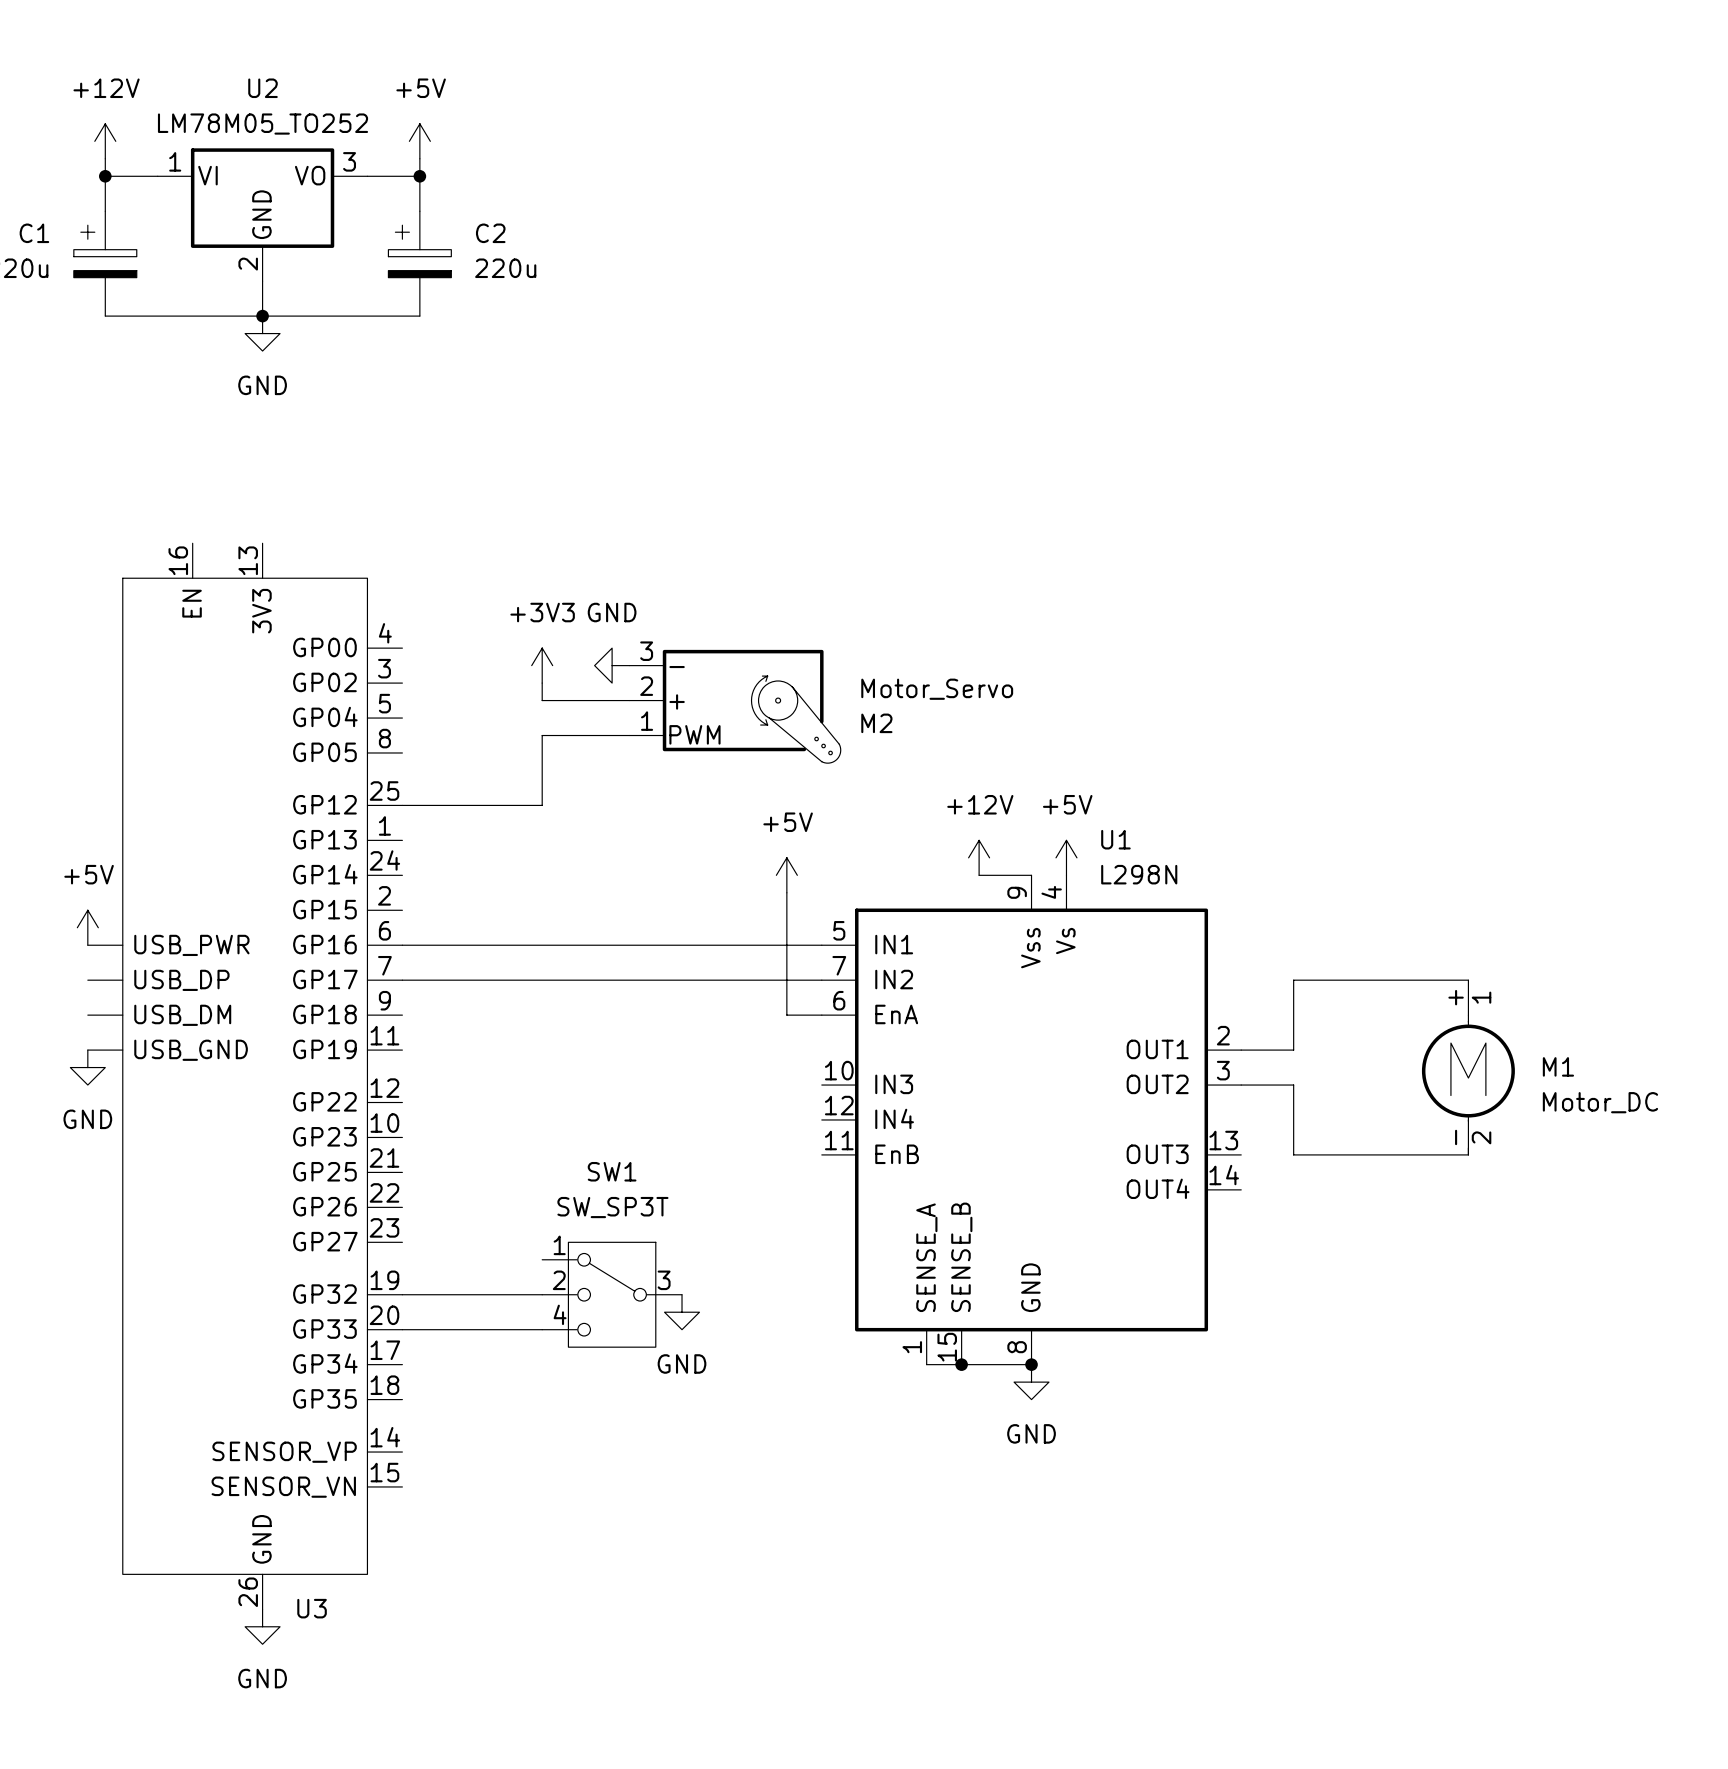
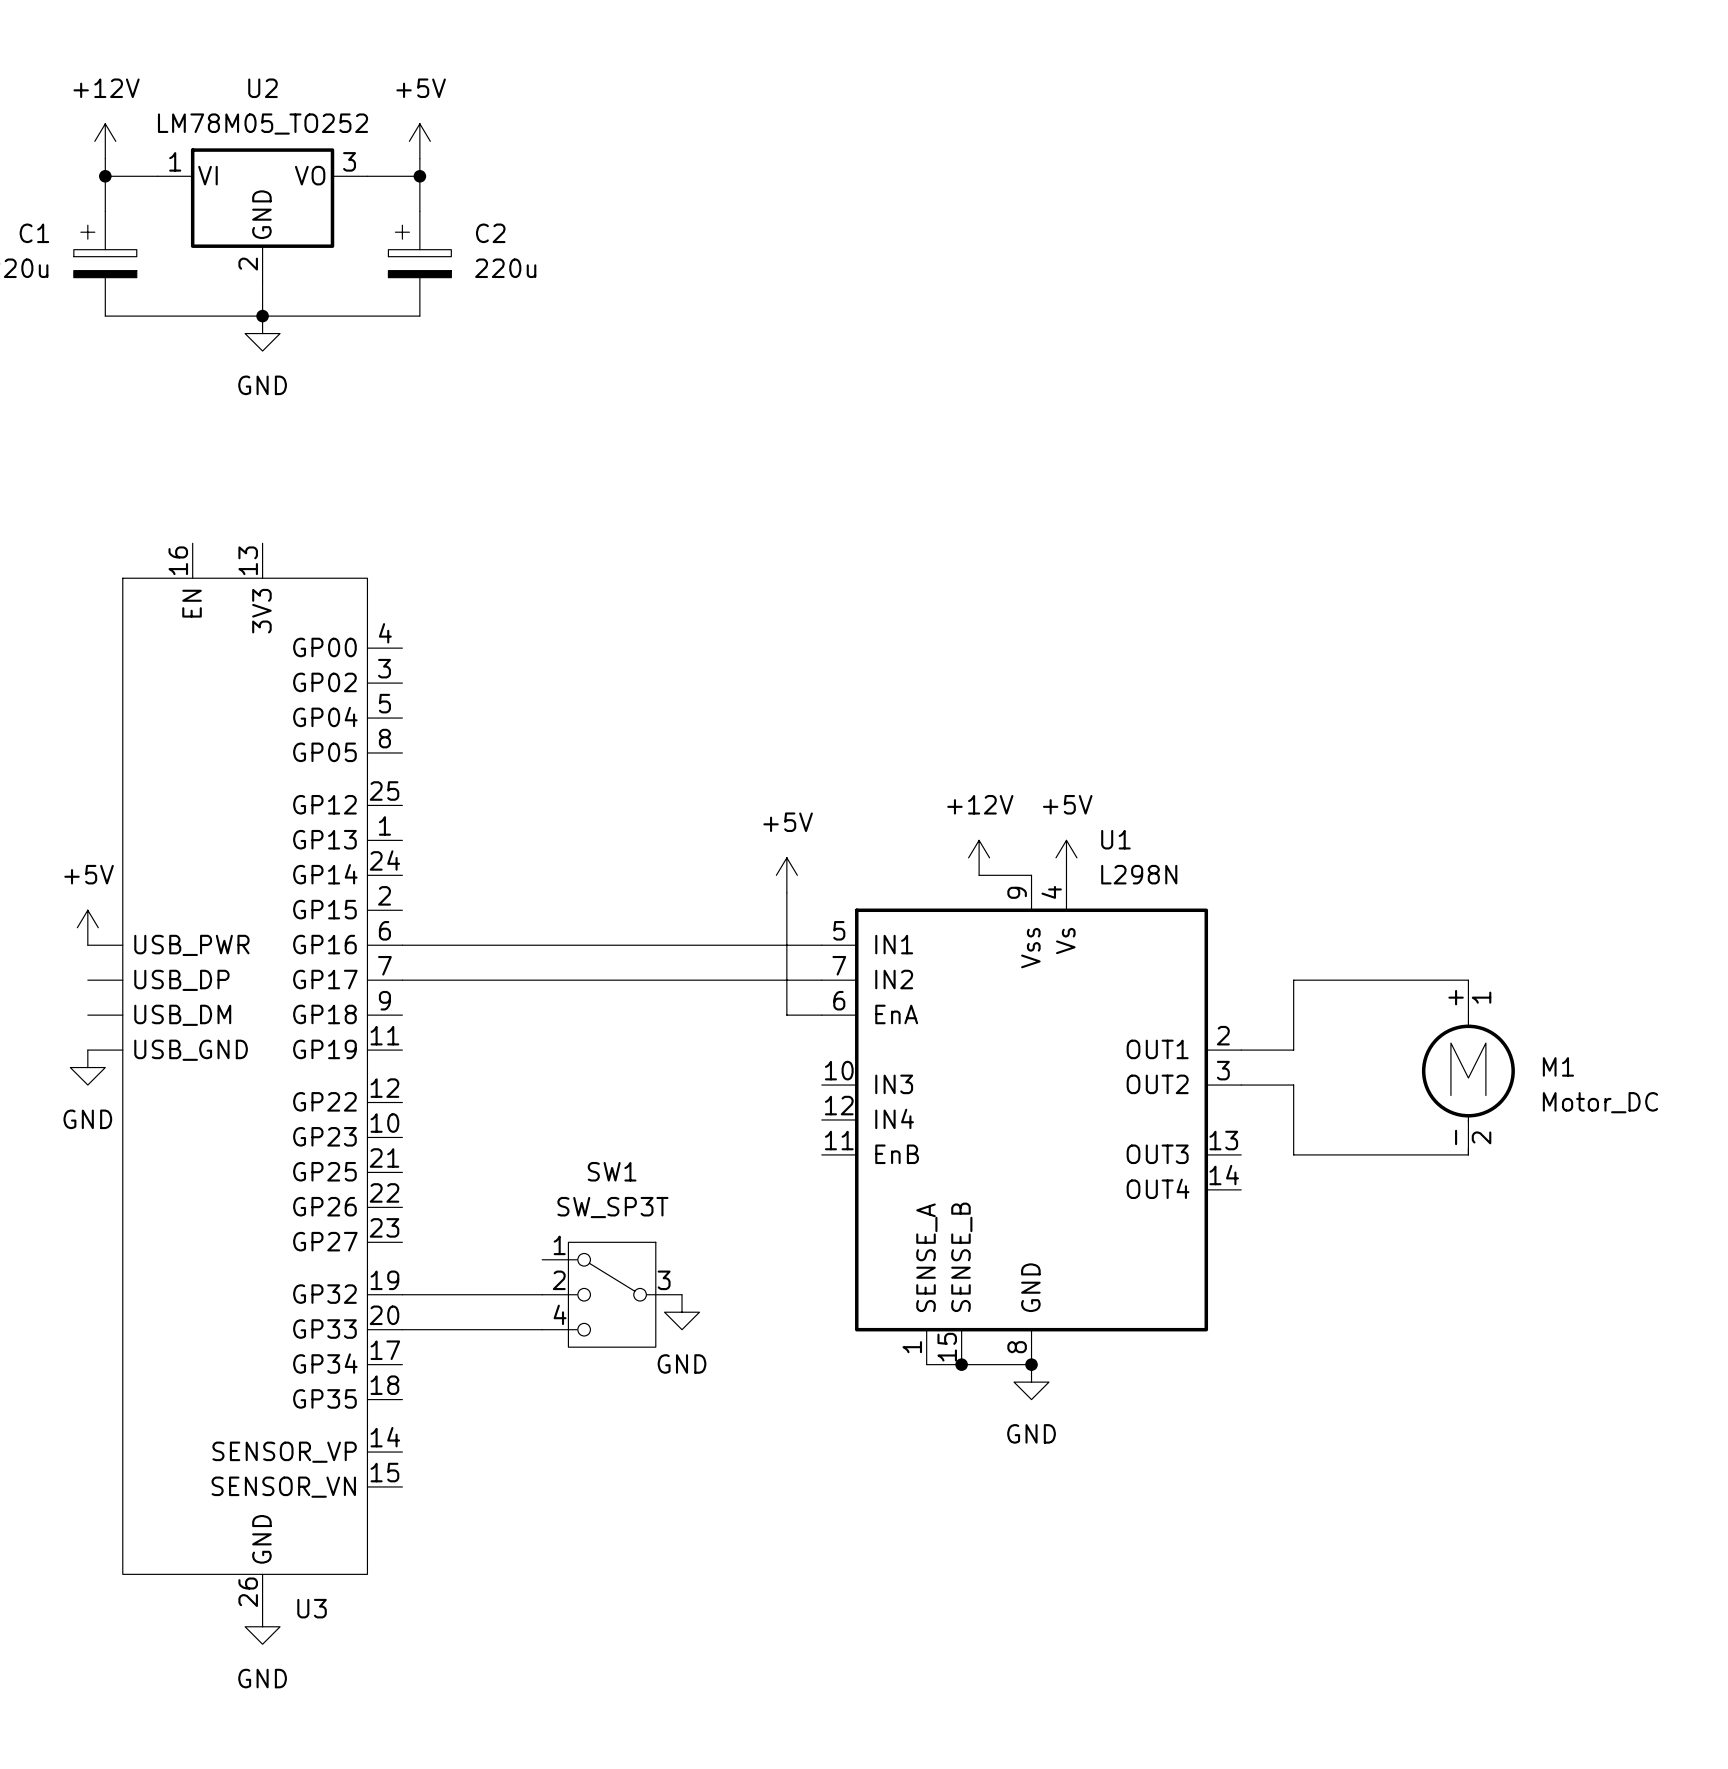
power symbol: +3V3 (542, 665) -> none
power symbol: GND (612, 665) -> none
wire: (542, 683) (542, 700) (629, 700) -> none
M2: Motor_Servo (735, 706) -> none
wire: (629, 735) (542, 735) (542, 805) (402, 805) -> none

